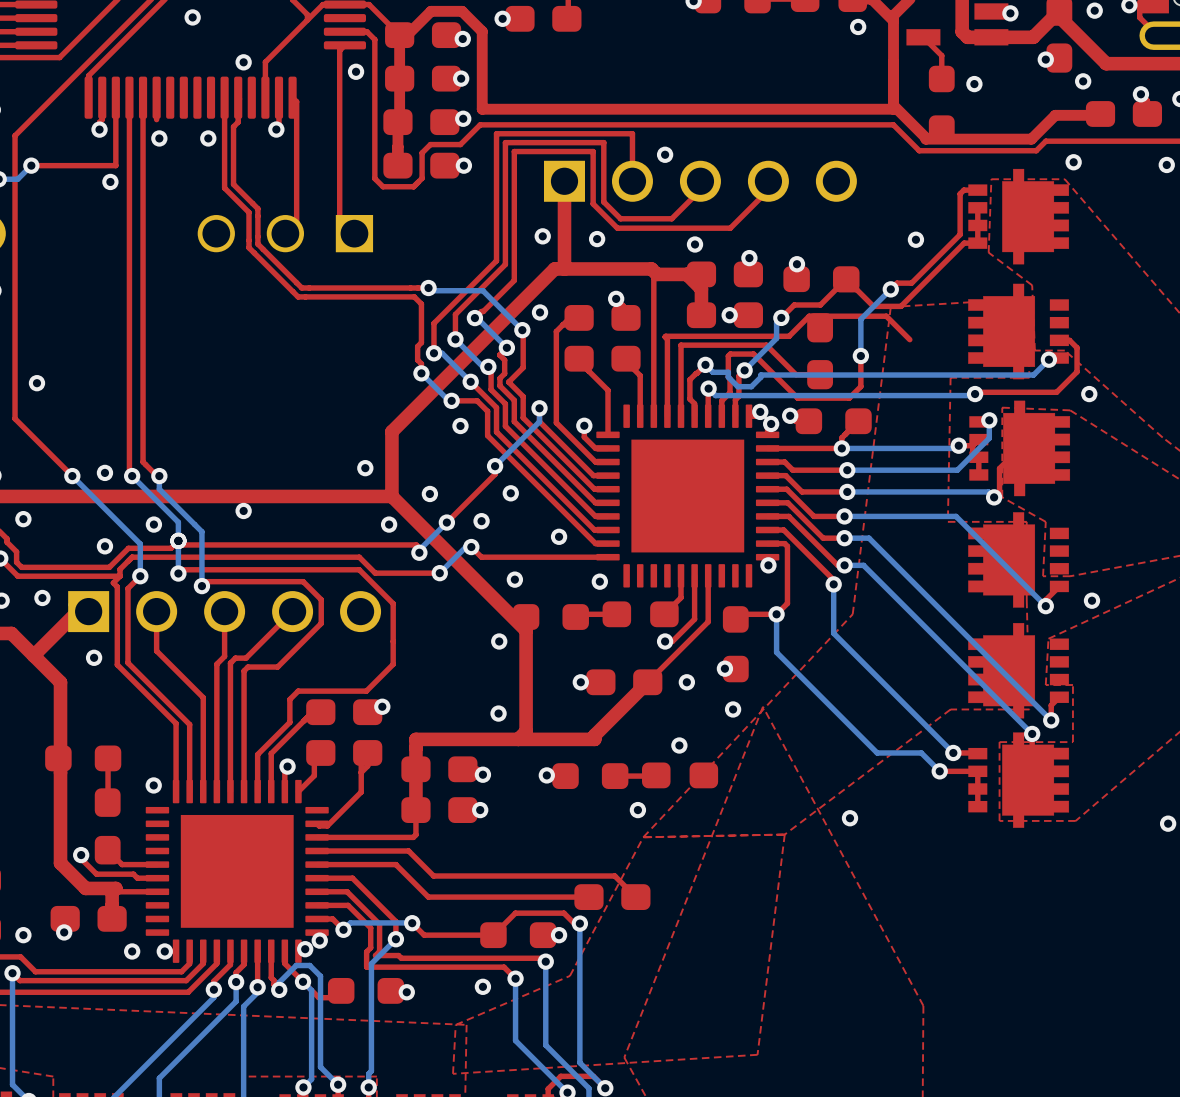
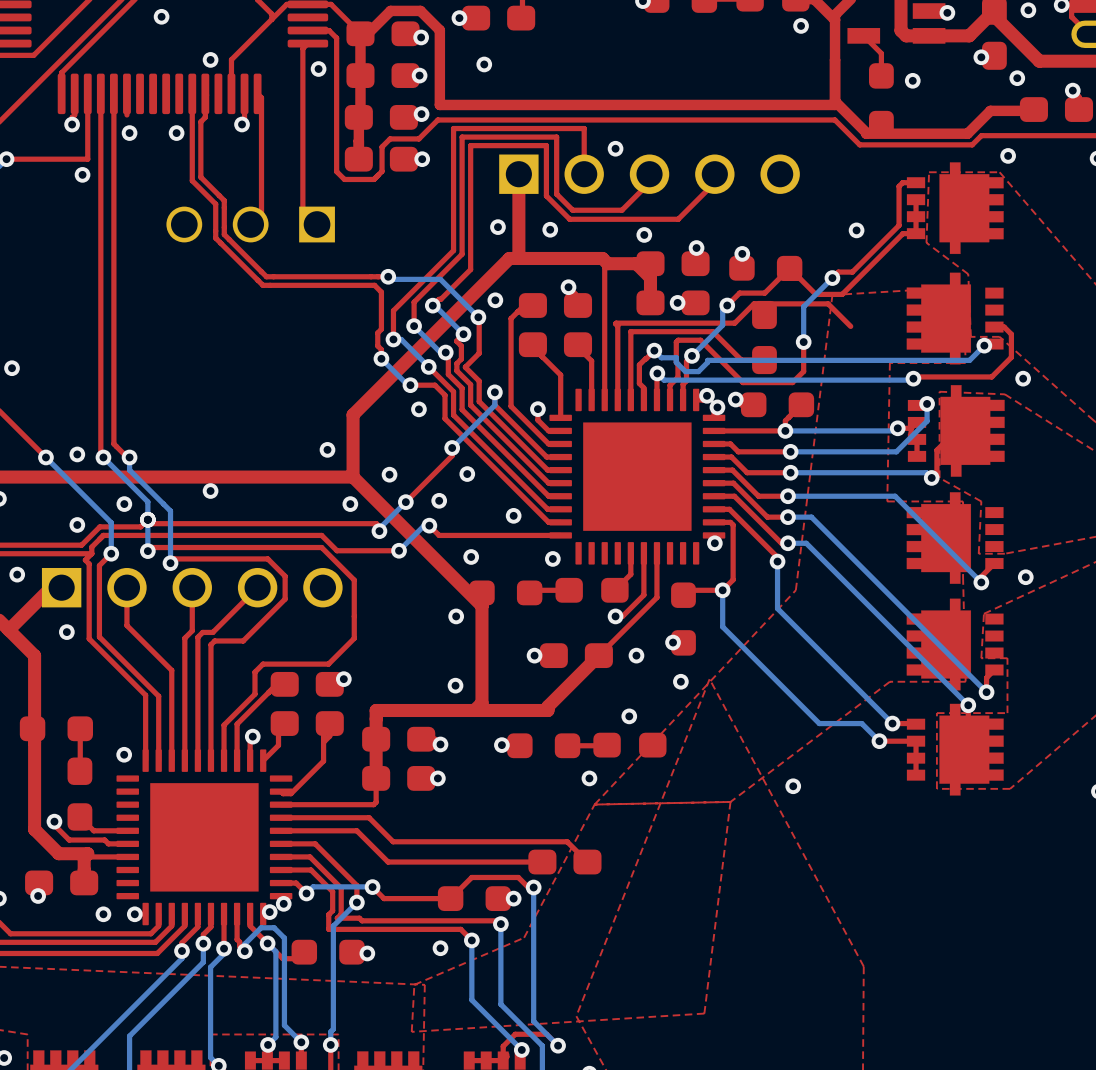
via: none -> (484, 64)

